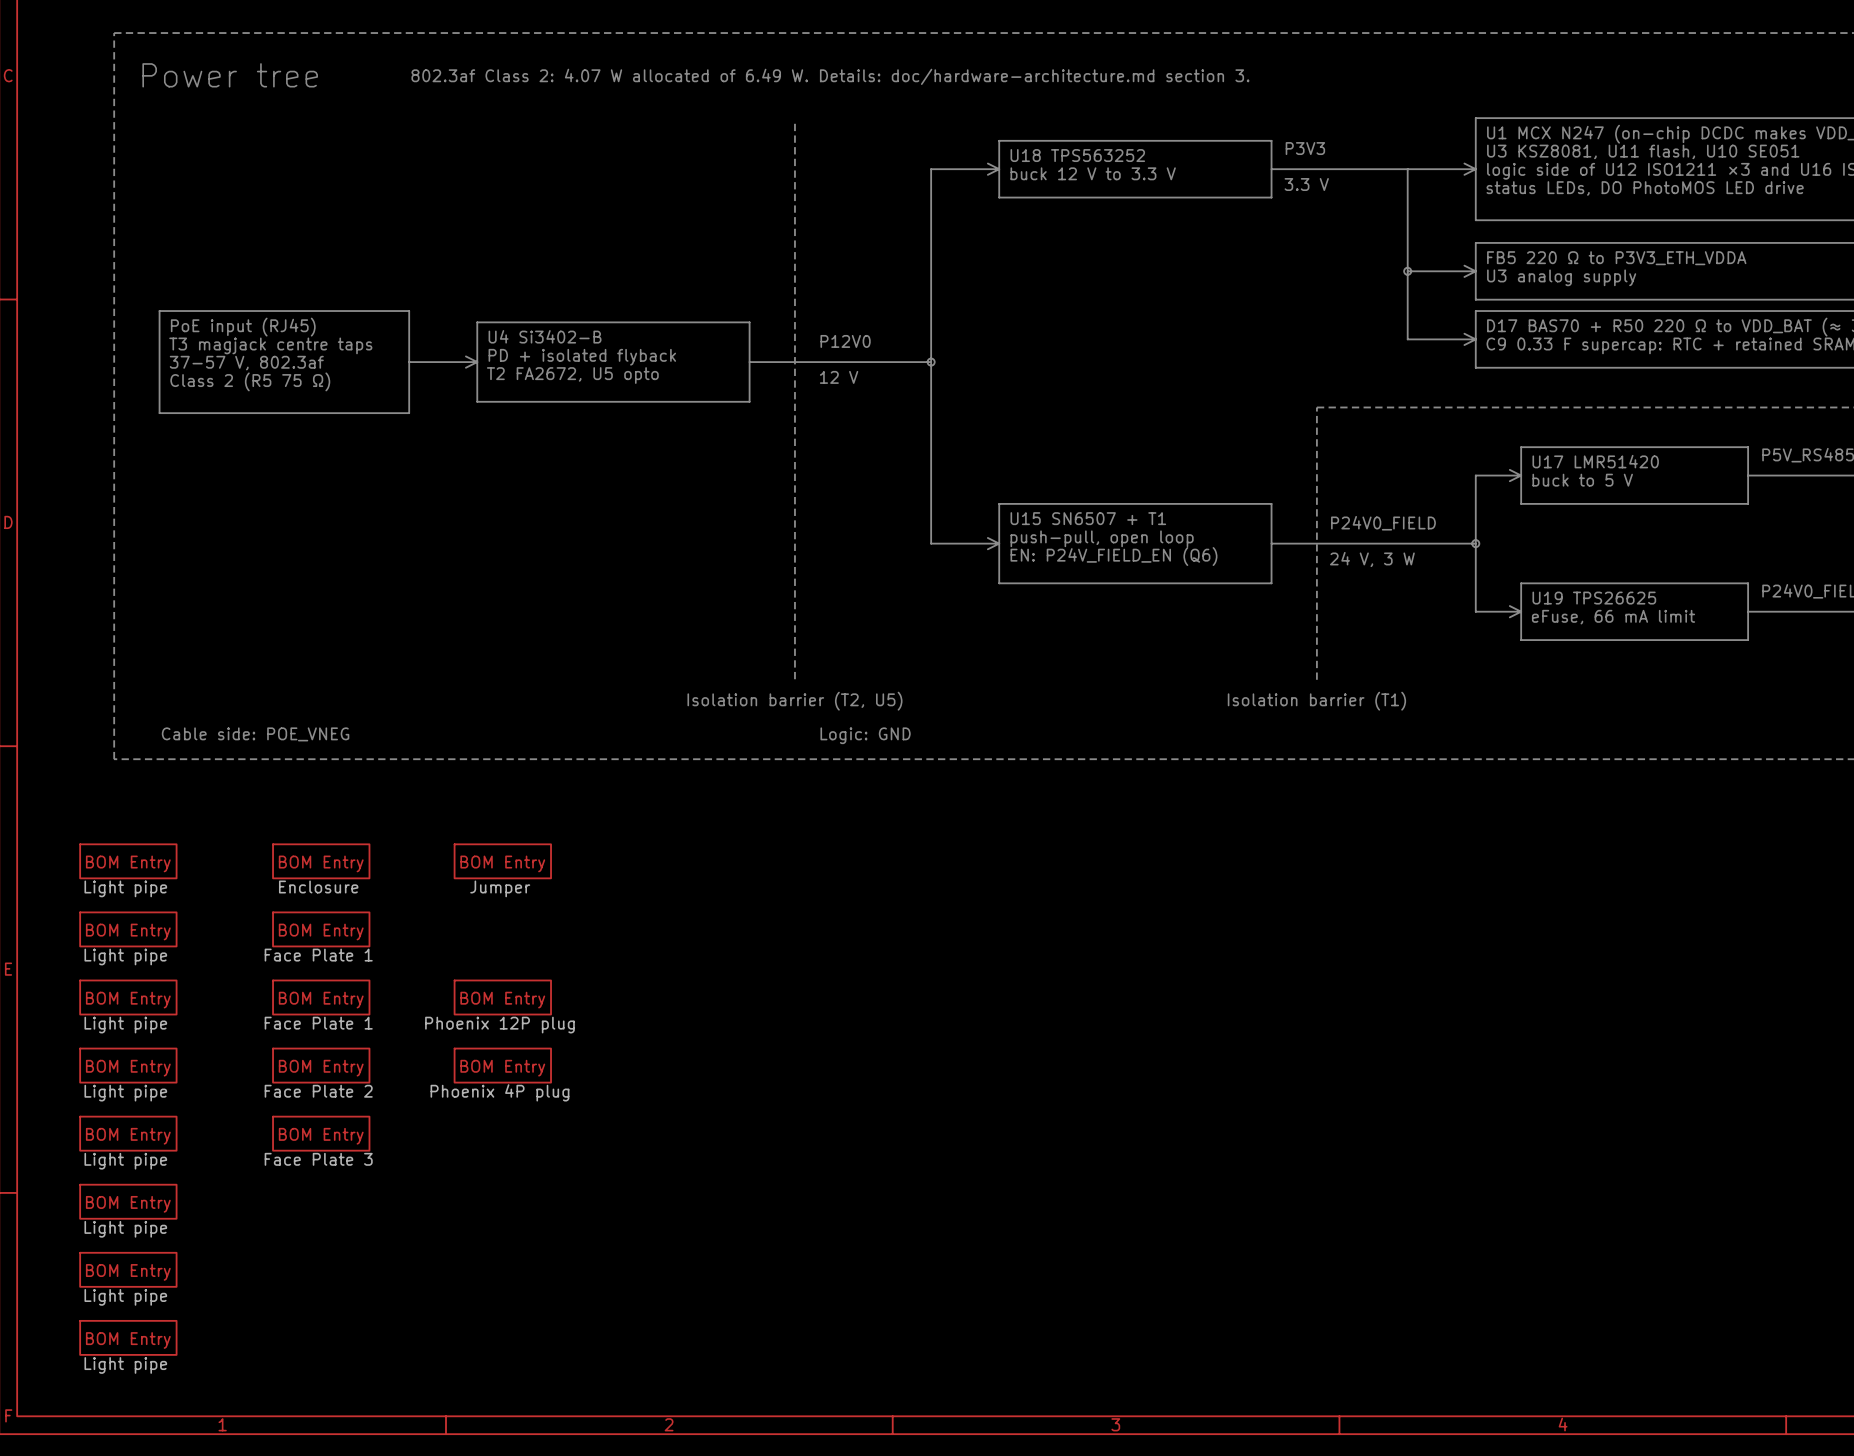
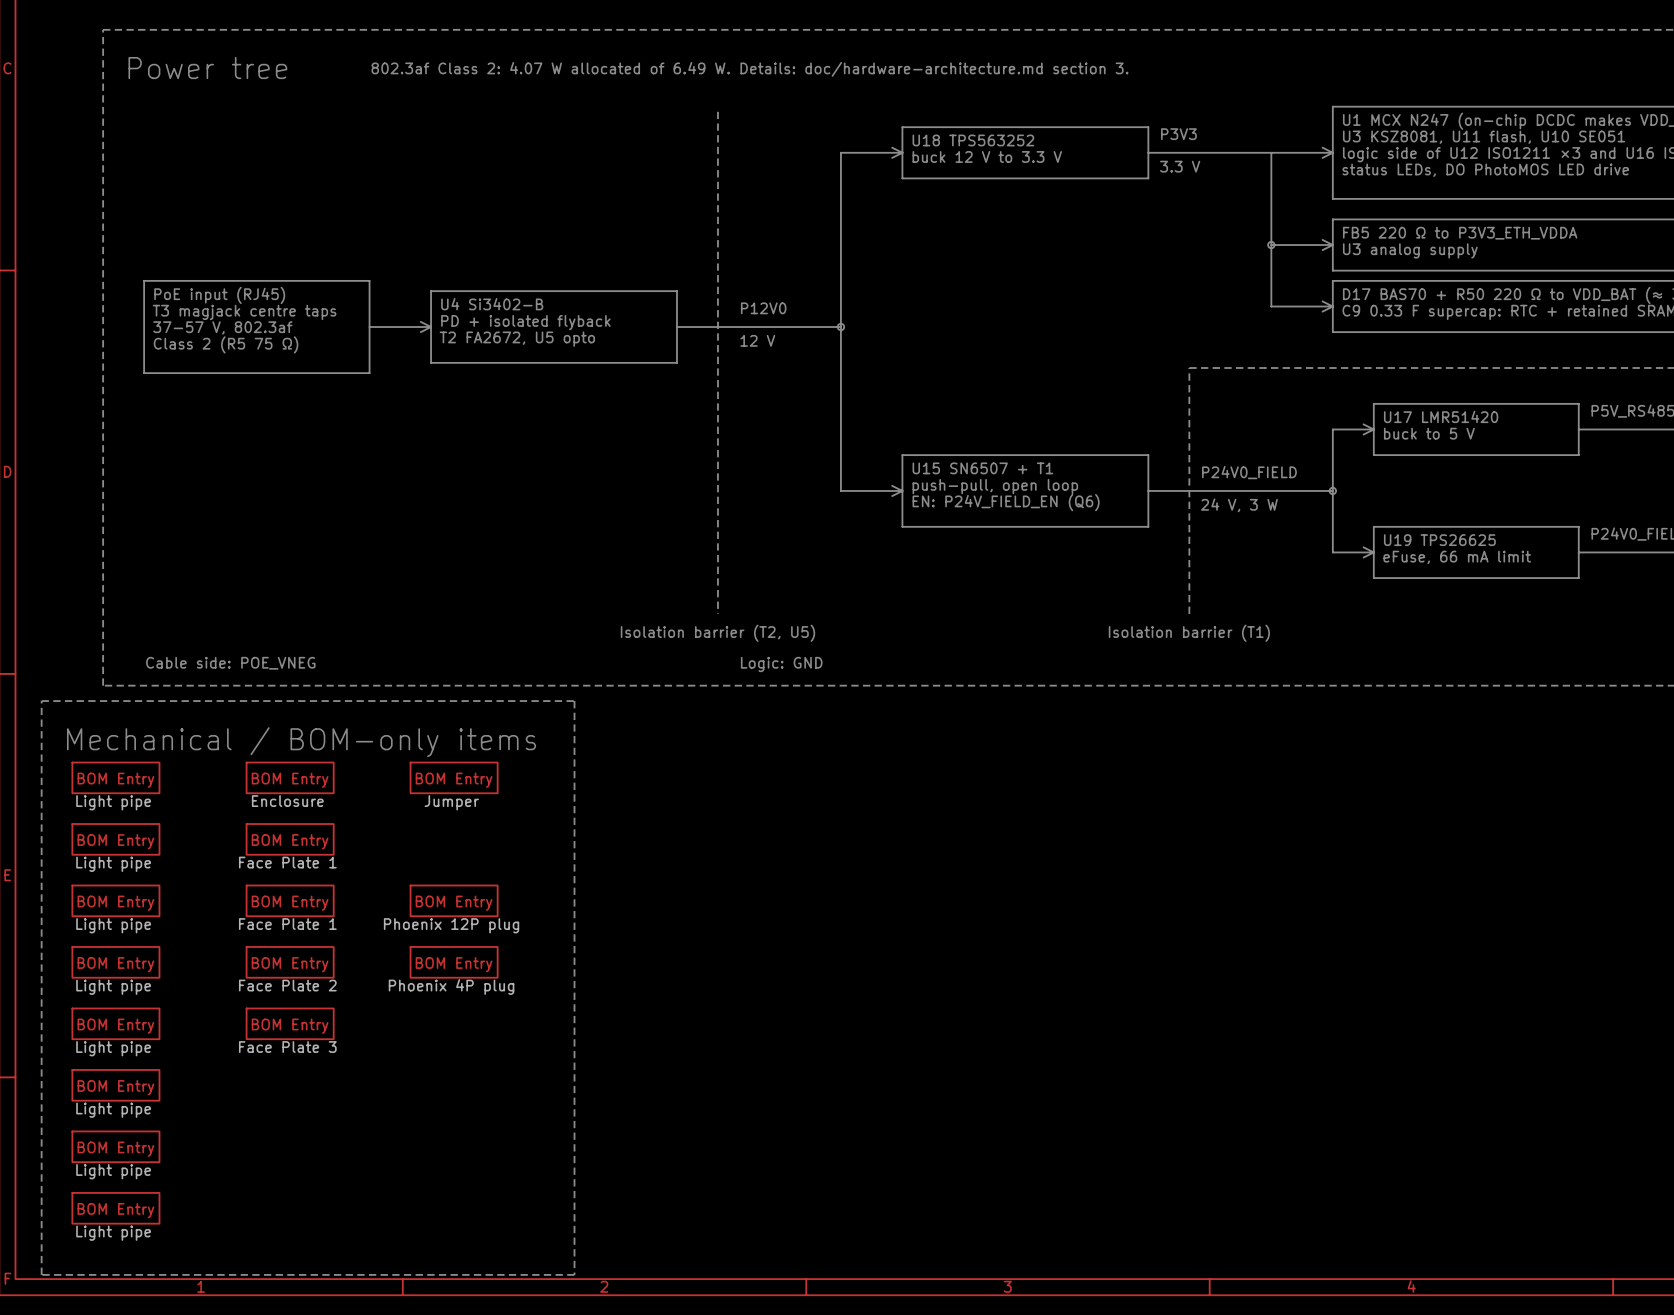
line: none -> (41, 701) (574, 701) (574, 1274) (41, 1274) (41, 701)
text: none -> Mechanical / BOM-only items (301, 742)

